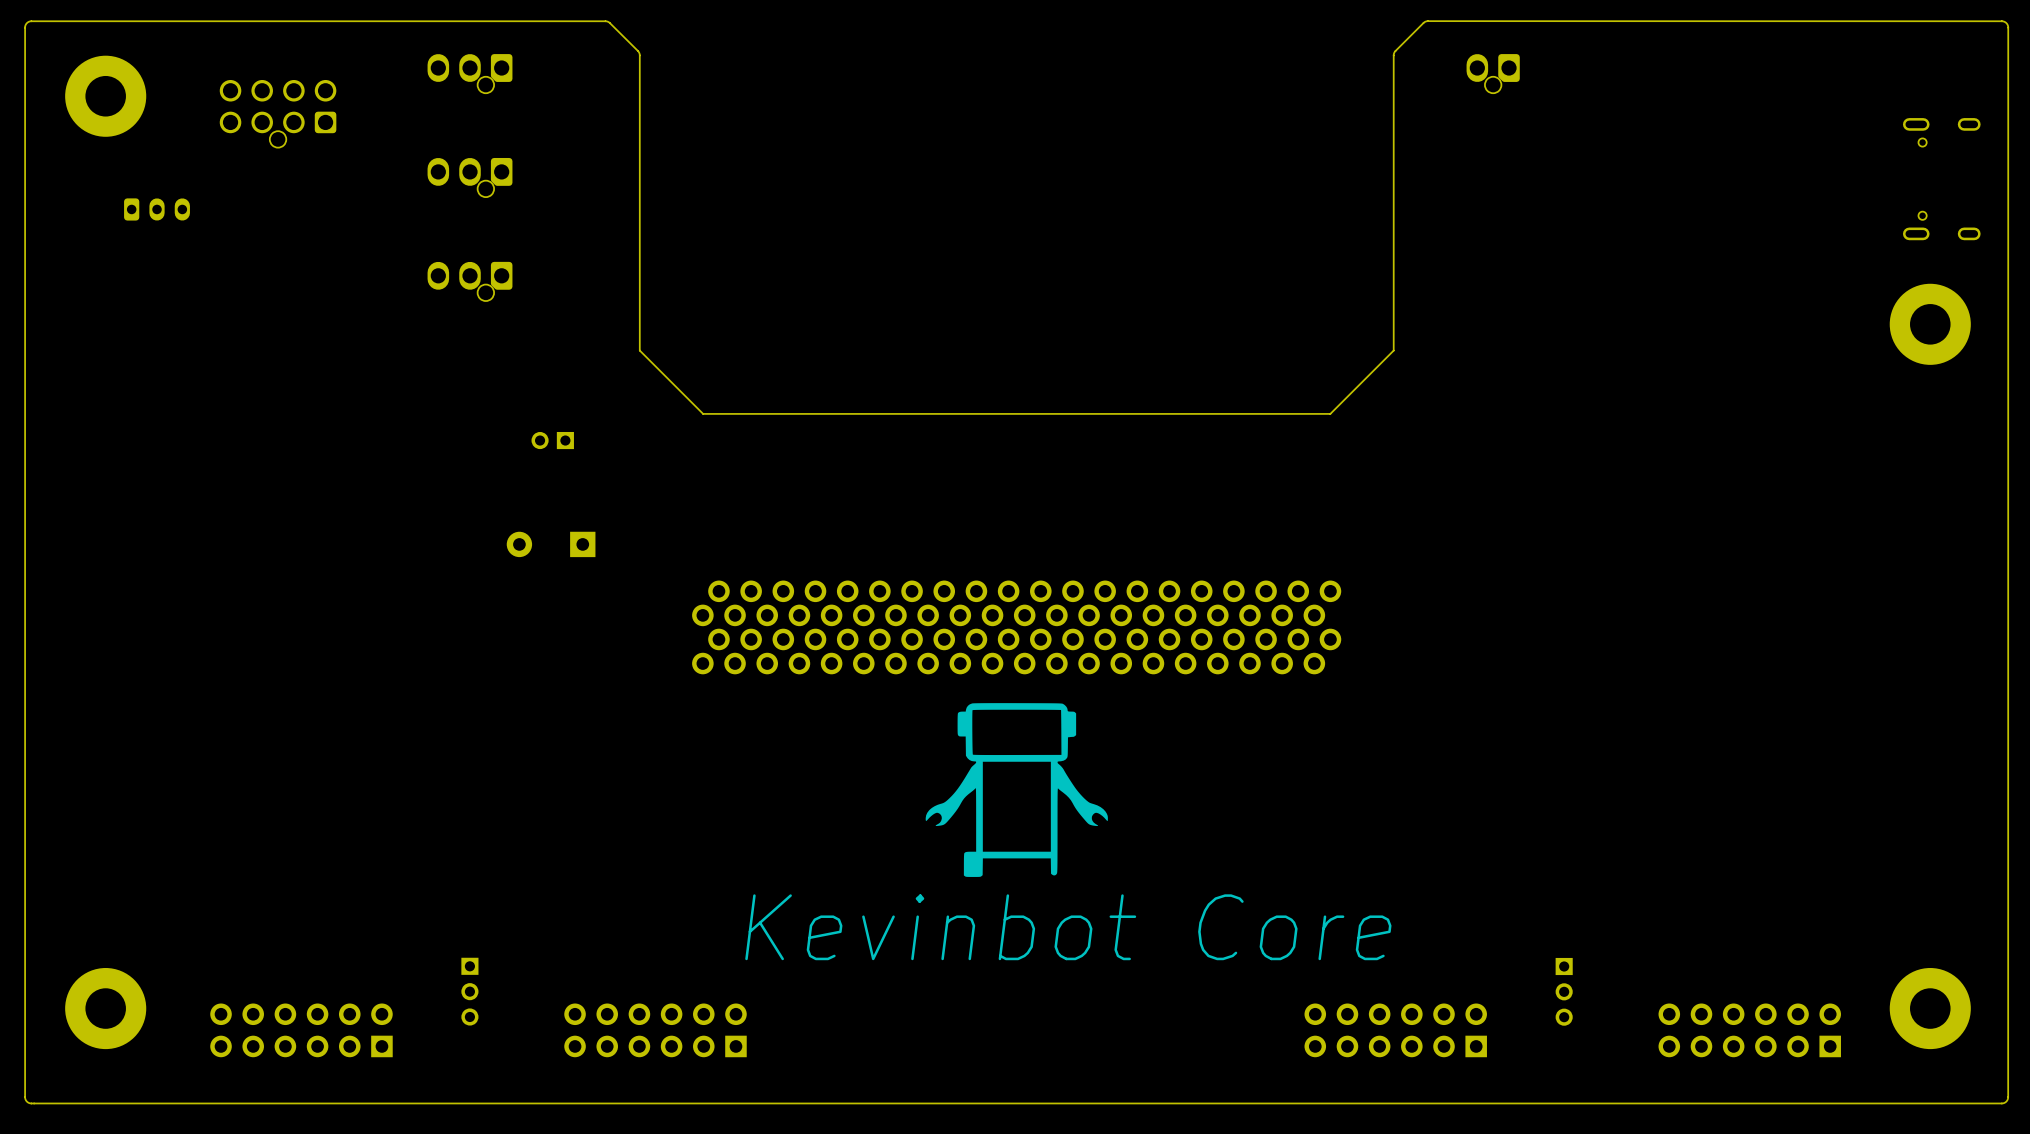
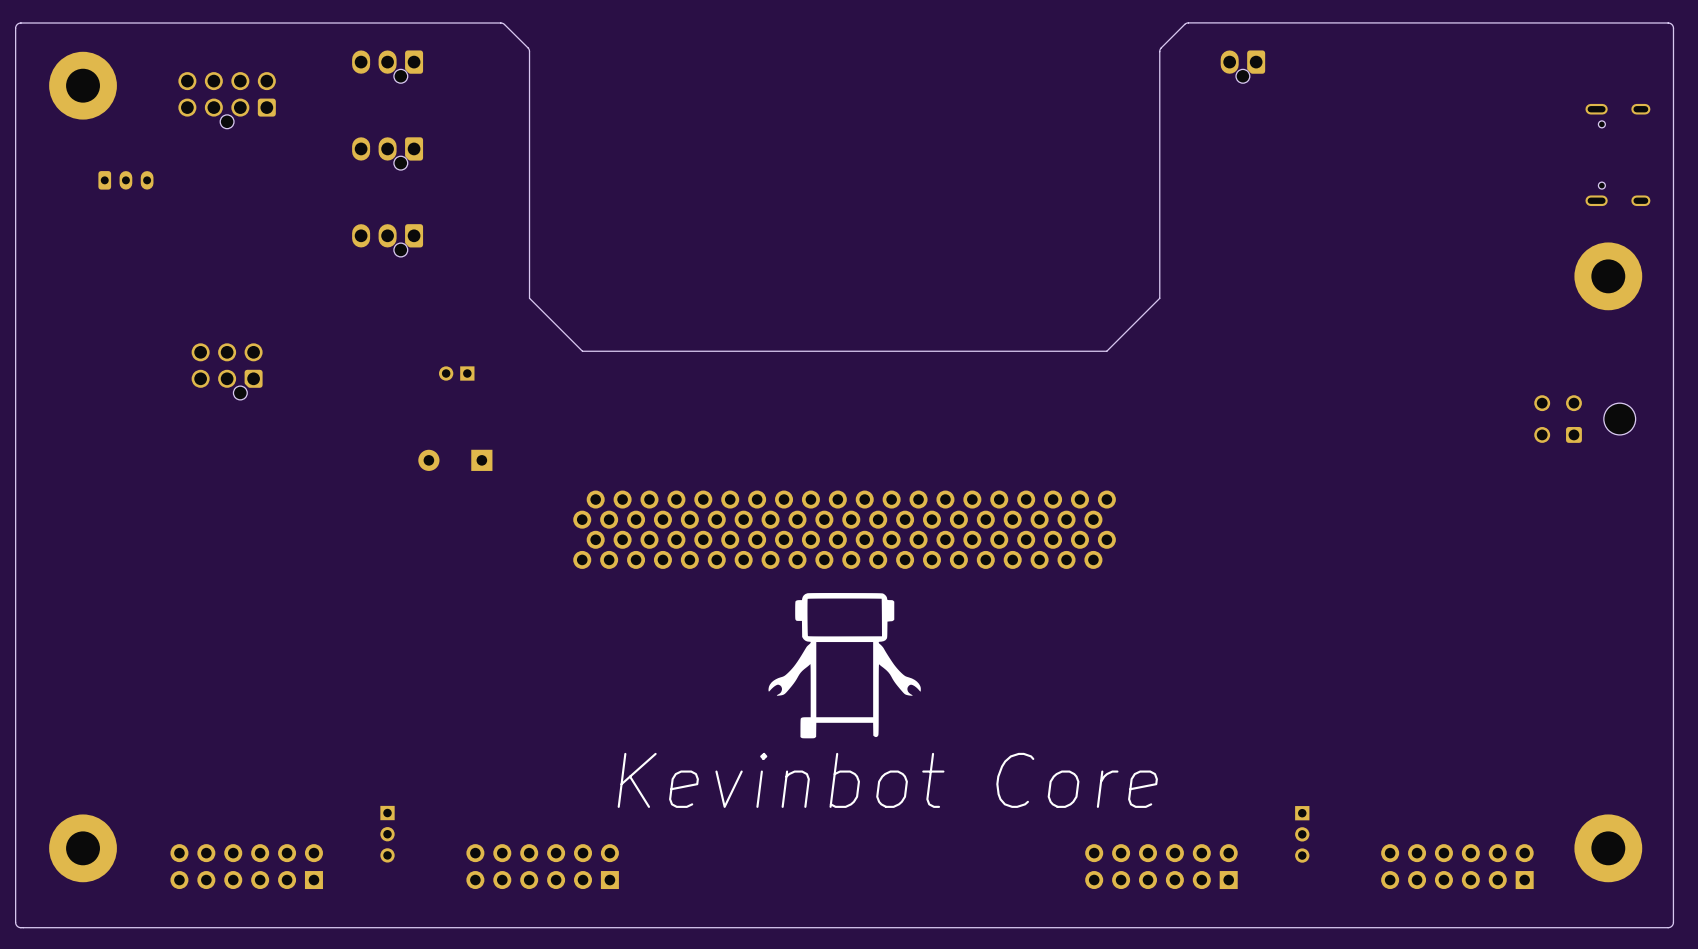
part: none -> (227, 371)
part: none -> (1584, 419)

